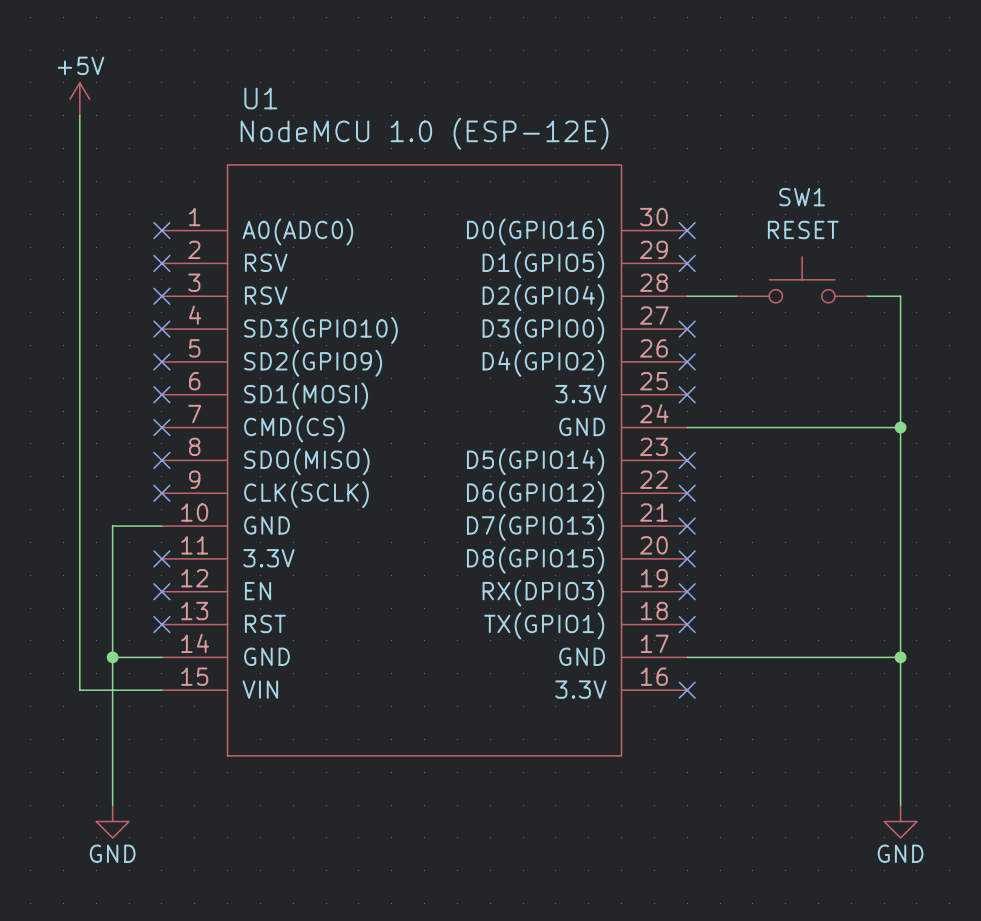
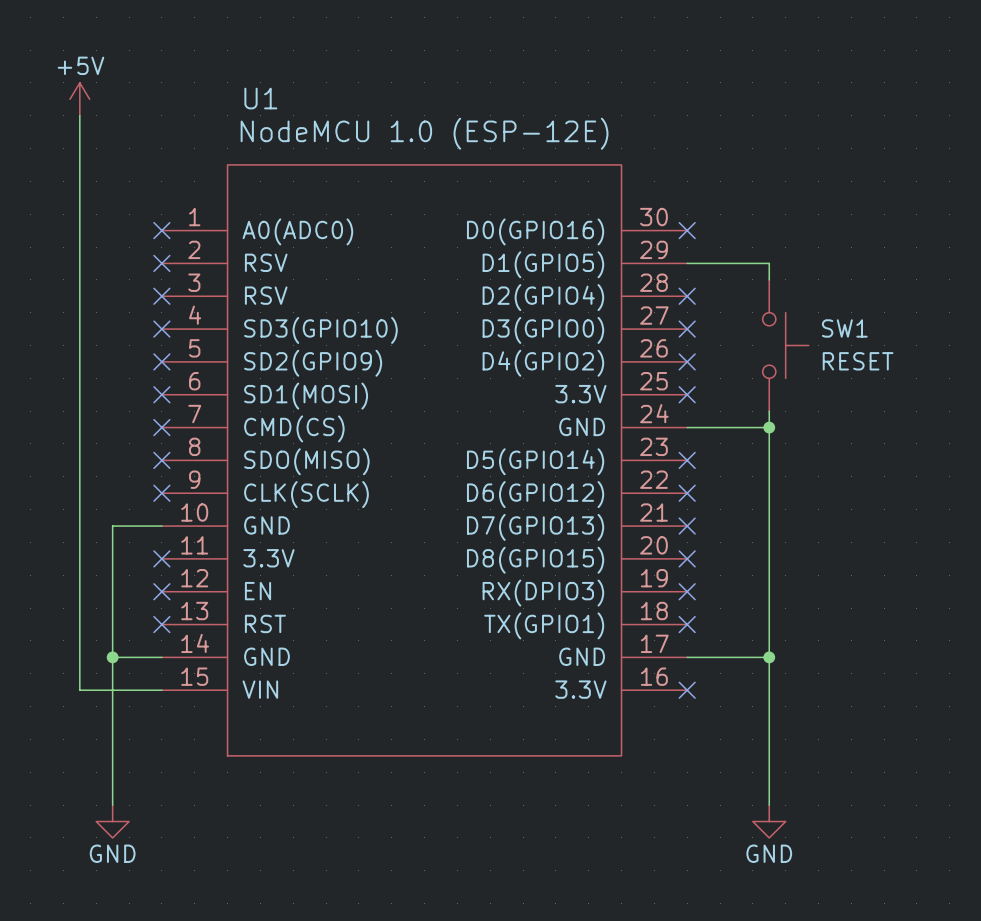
SW1 value position: RESET (803, 229) -> RESET (858, 361)
wire: none -> (687, 263) (769, 263) (769, 279)
no-connect mark position: (687, 263) -> (687, 296)
SW1 rotation: 0° (802, 279) -> 90° clockwise (785, 345)
wire: (687, 296) (736, 296) -> none
wire: (867, 296) (900, 296) (900, 805) -> none
wire: none -> (769, 411) (769, 805)
wire: (769, 427) (900, 427) -> none
junction: none -> (769, 427)
junction: (900, 427) -> none
wire: (769, 657) (900, 657) -> none
junction: none -> (769, 657)
junction: (900, 657) -> none
power symbol position: GND (900, 821) -> GND (769, 821)

